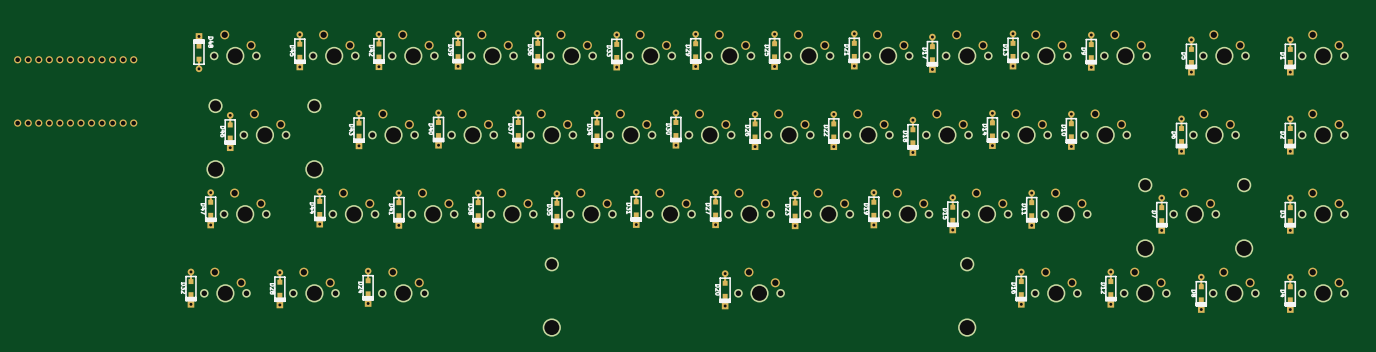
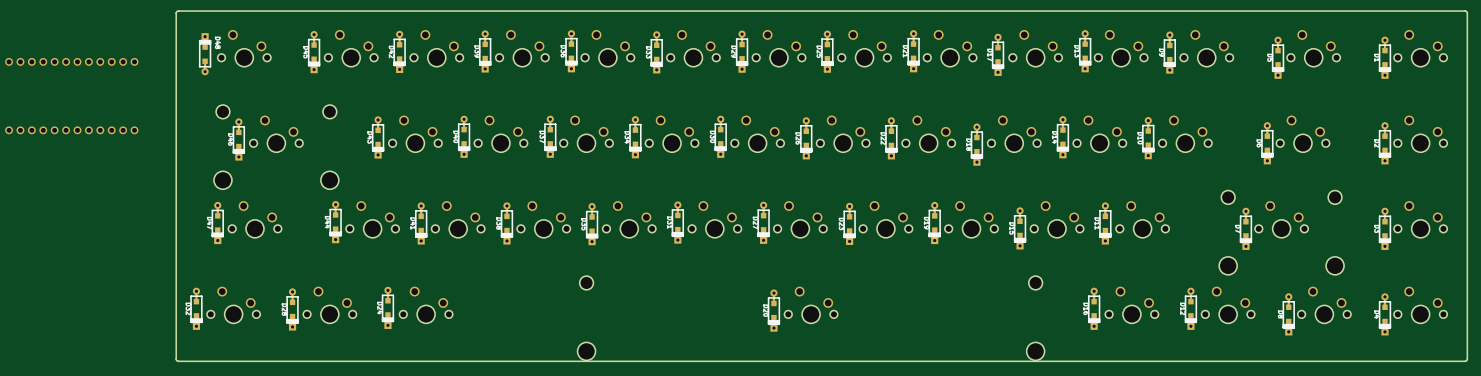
board edge: none -> (1465, 11) (177, 11) (176, 13) (176, 359) (178, 361) (1465, 361) (1467, 359) (1467, 13) (1465, 11)

